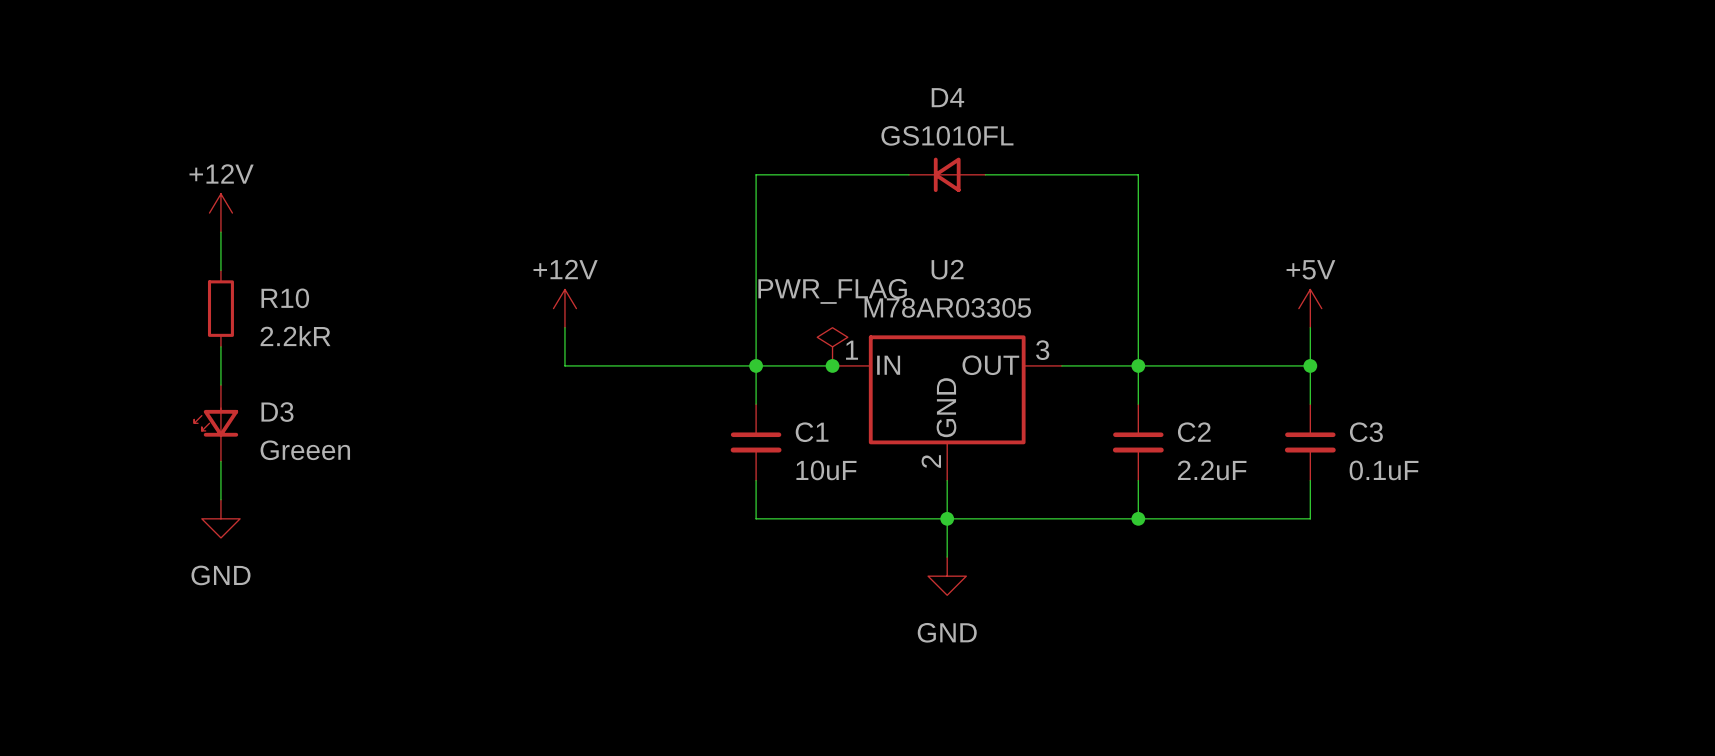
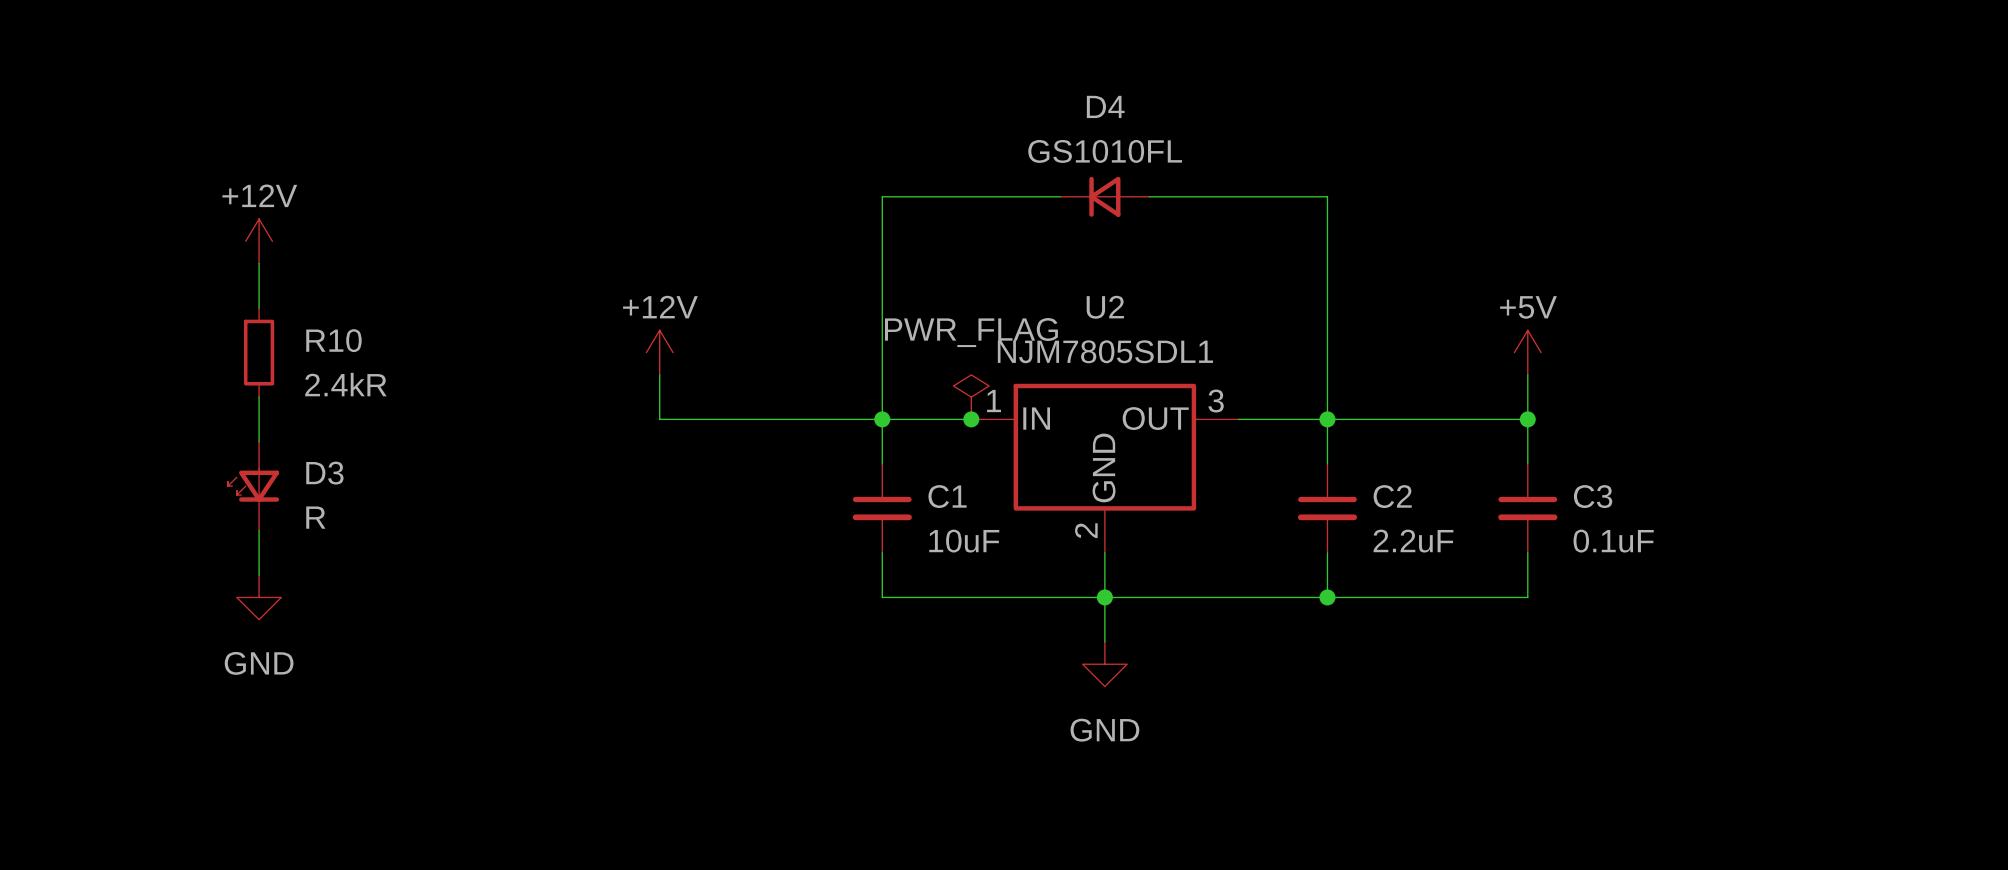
U2 value: M78AR03305 (947, 307) -> NJM7805SDL1 (1105, 351)
R10 value: 2.2kR (295, 336) -> 2.4kR (345, 384)
D3 value: Greeen (305, 450) -> R (315, 517)

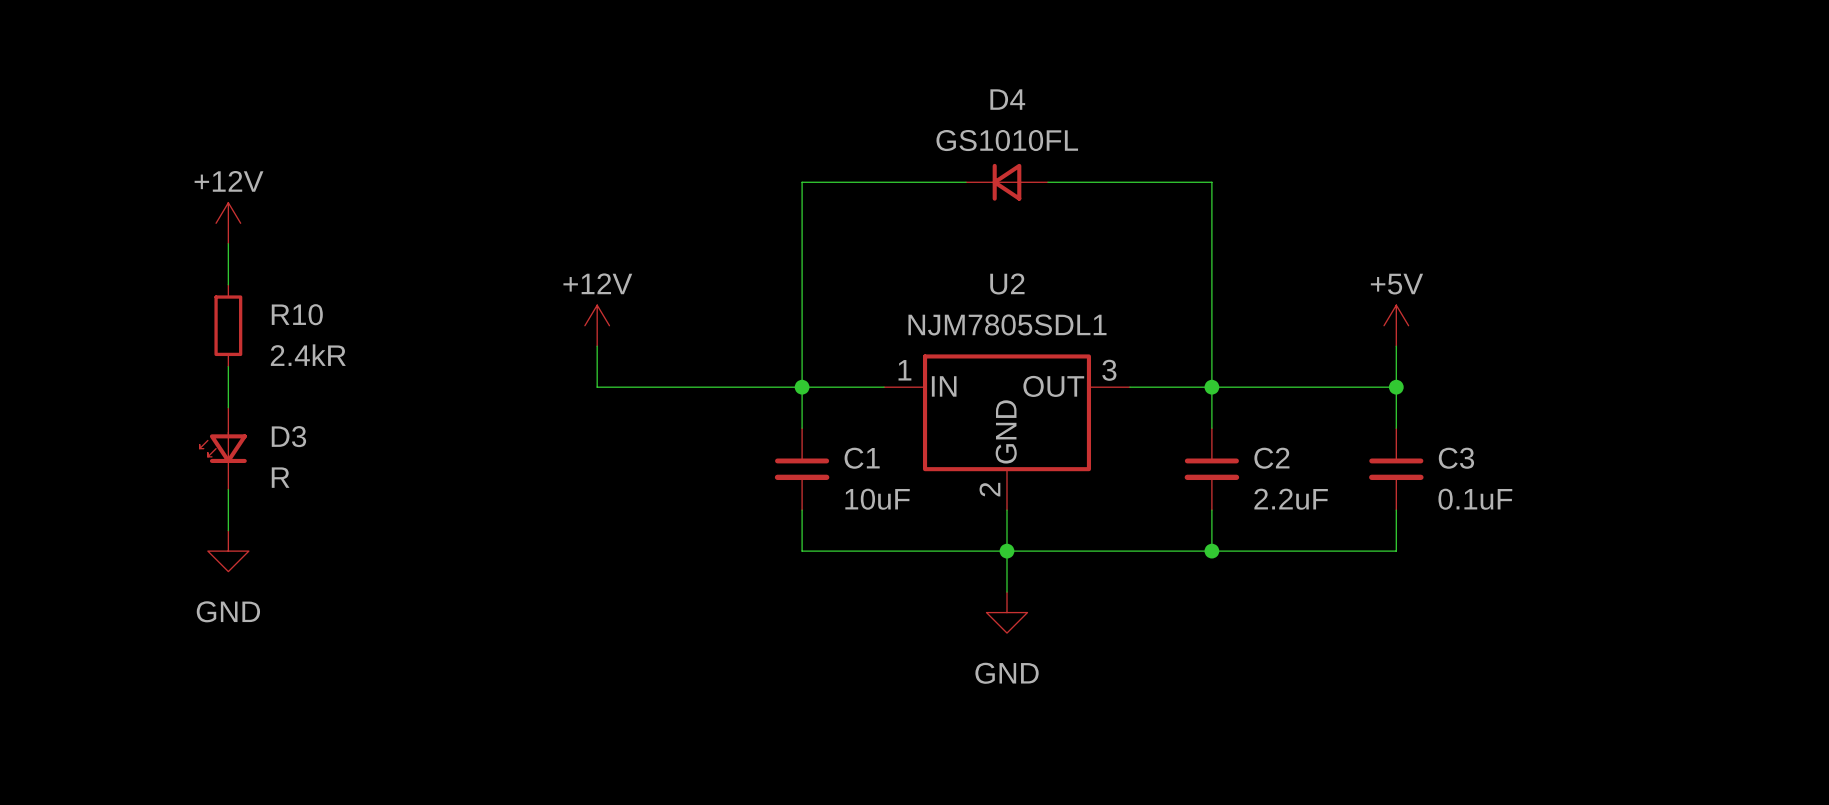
power symbol: PWR_FLAG (971, 397) -> none
junction: (971, 419) -> none

